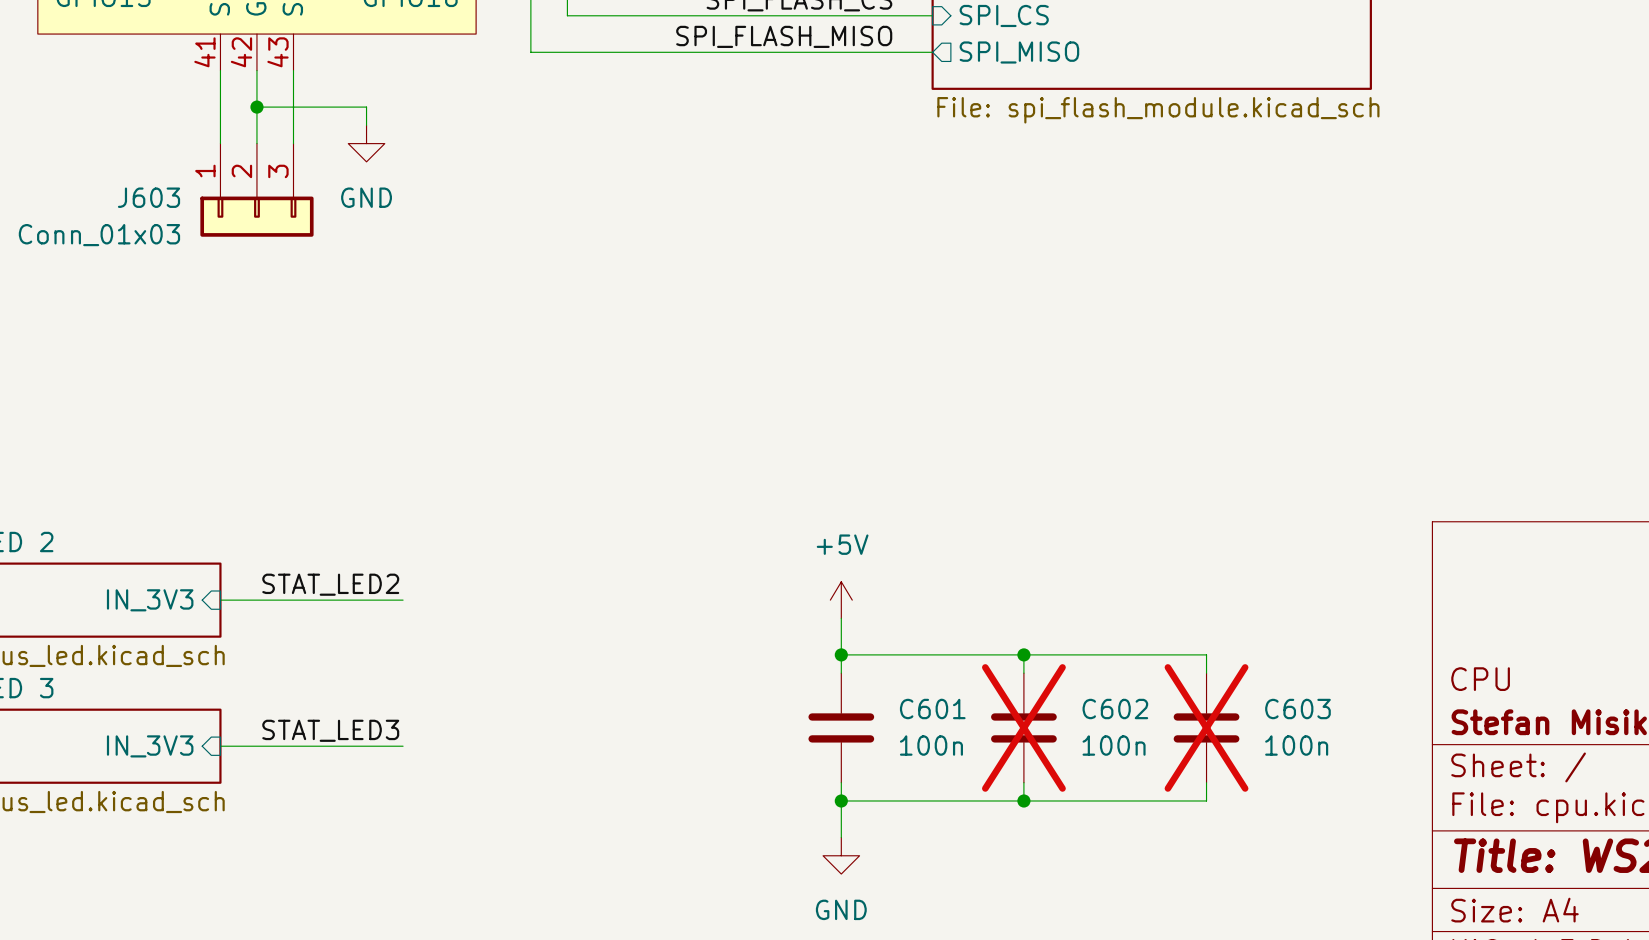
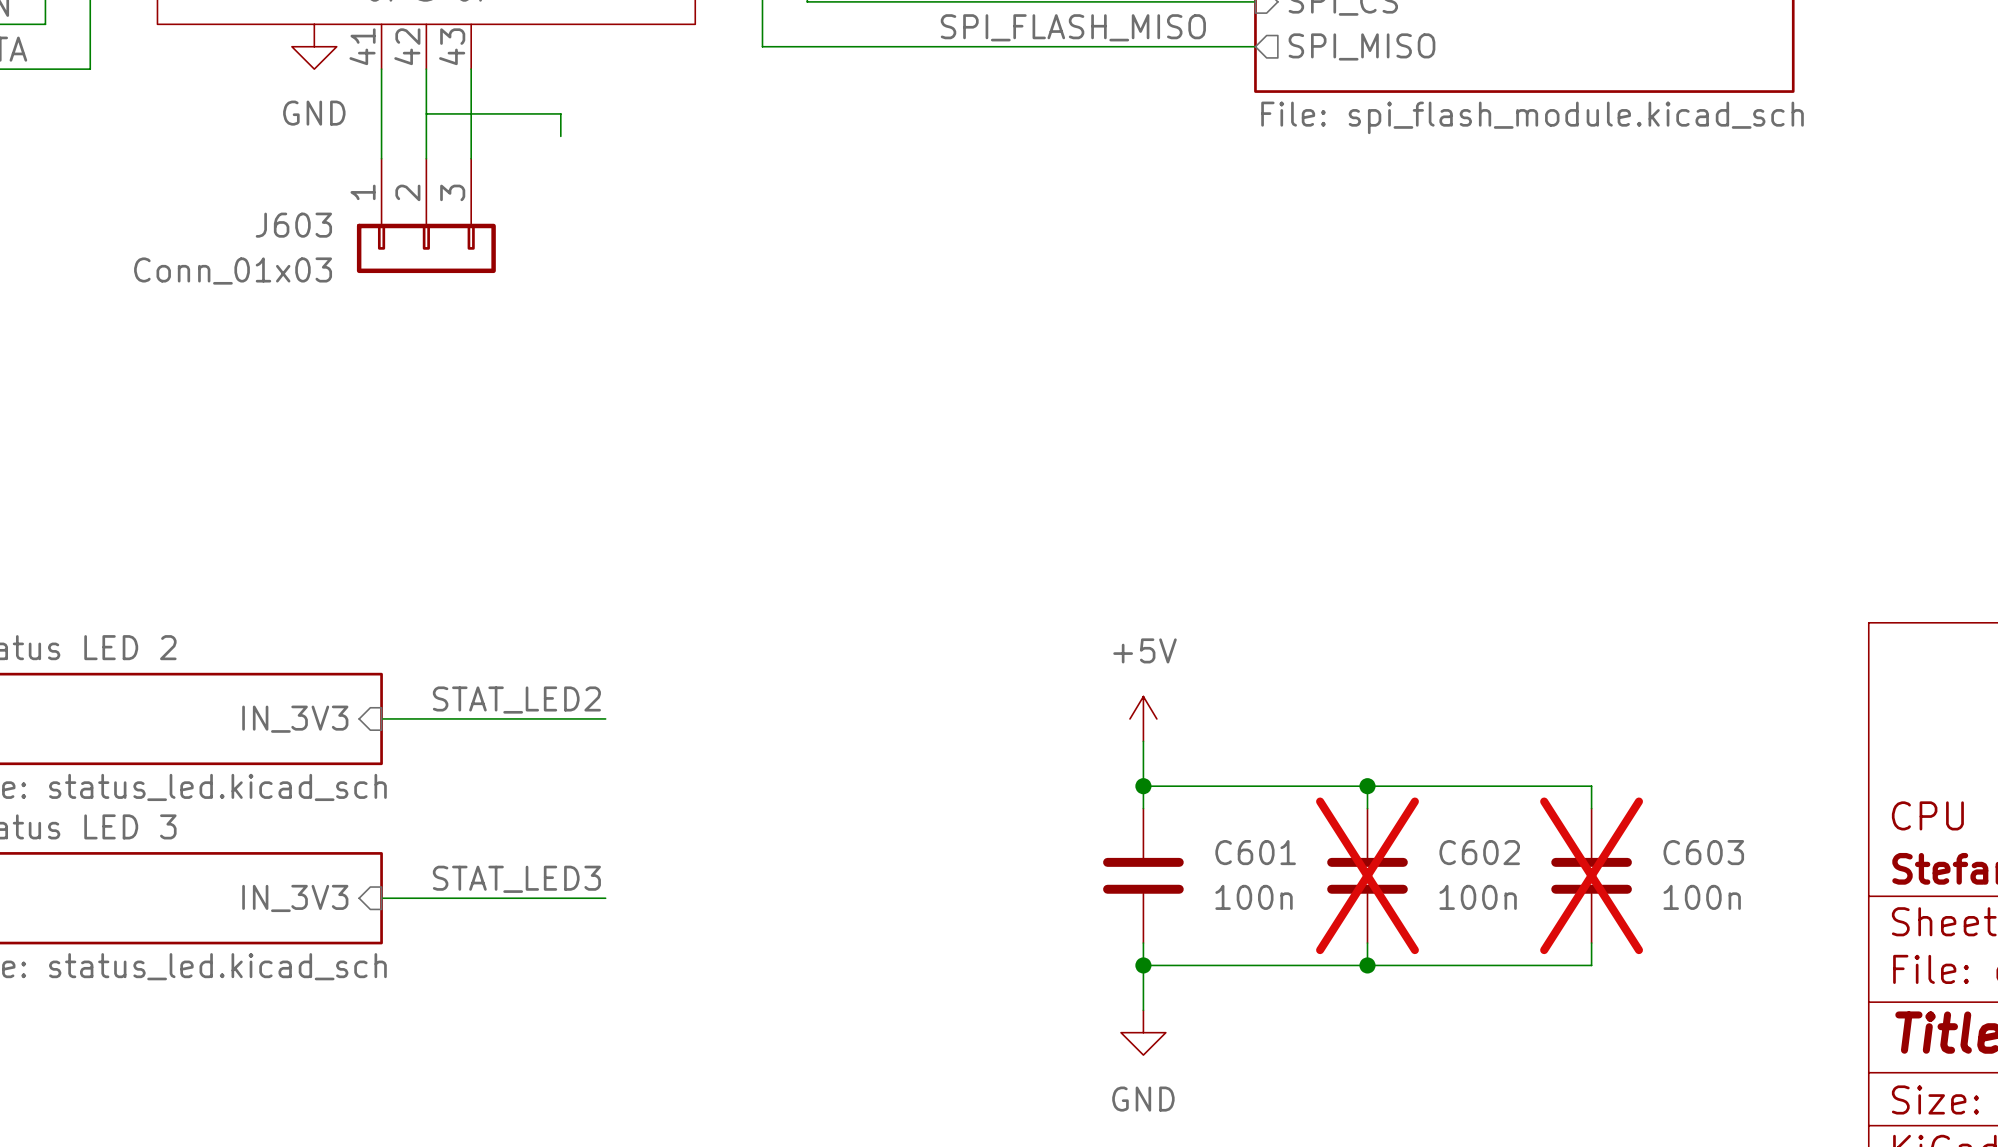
power symbol: none -> GND (314, 46)
junction: (256, 107) -> none
power symbol: GND (366, 143) -> none

